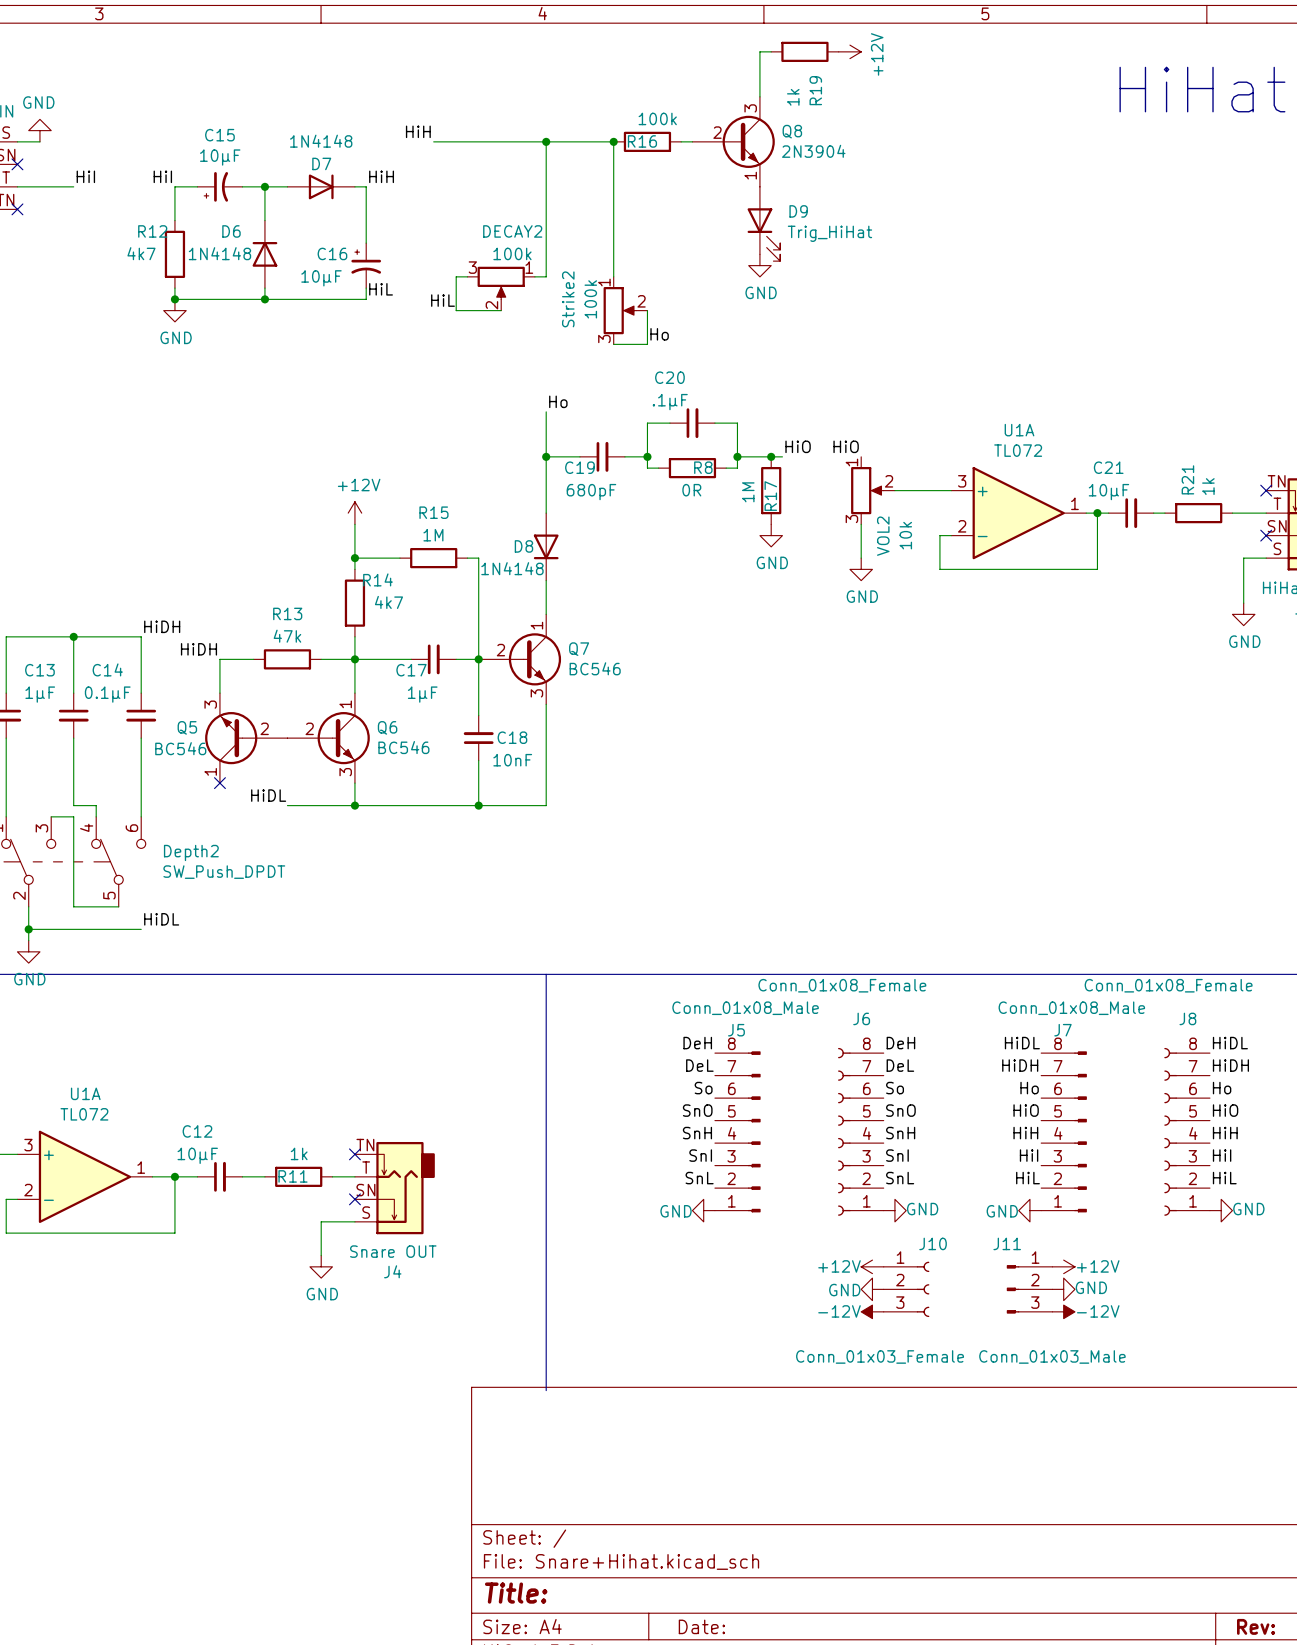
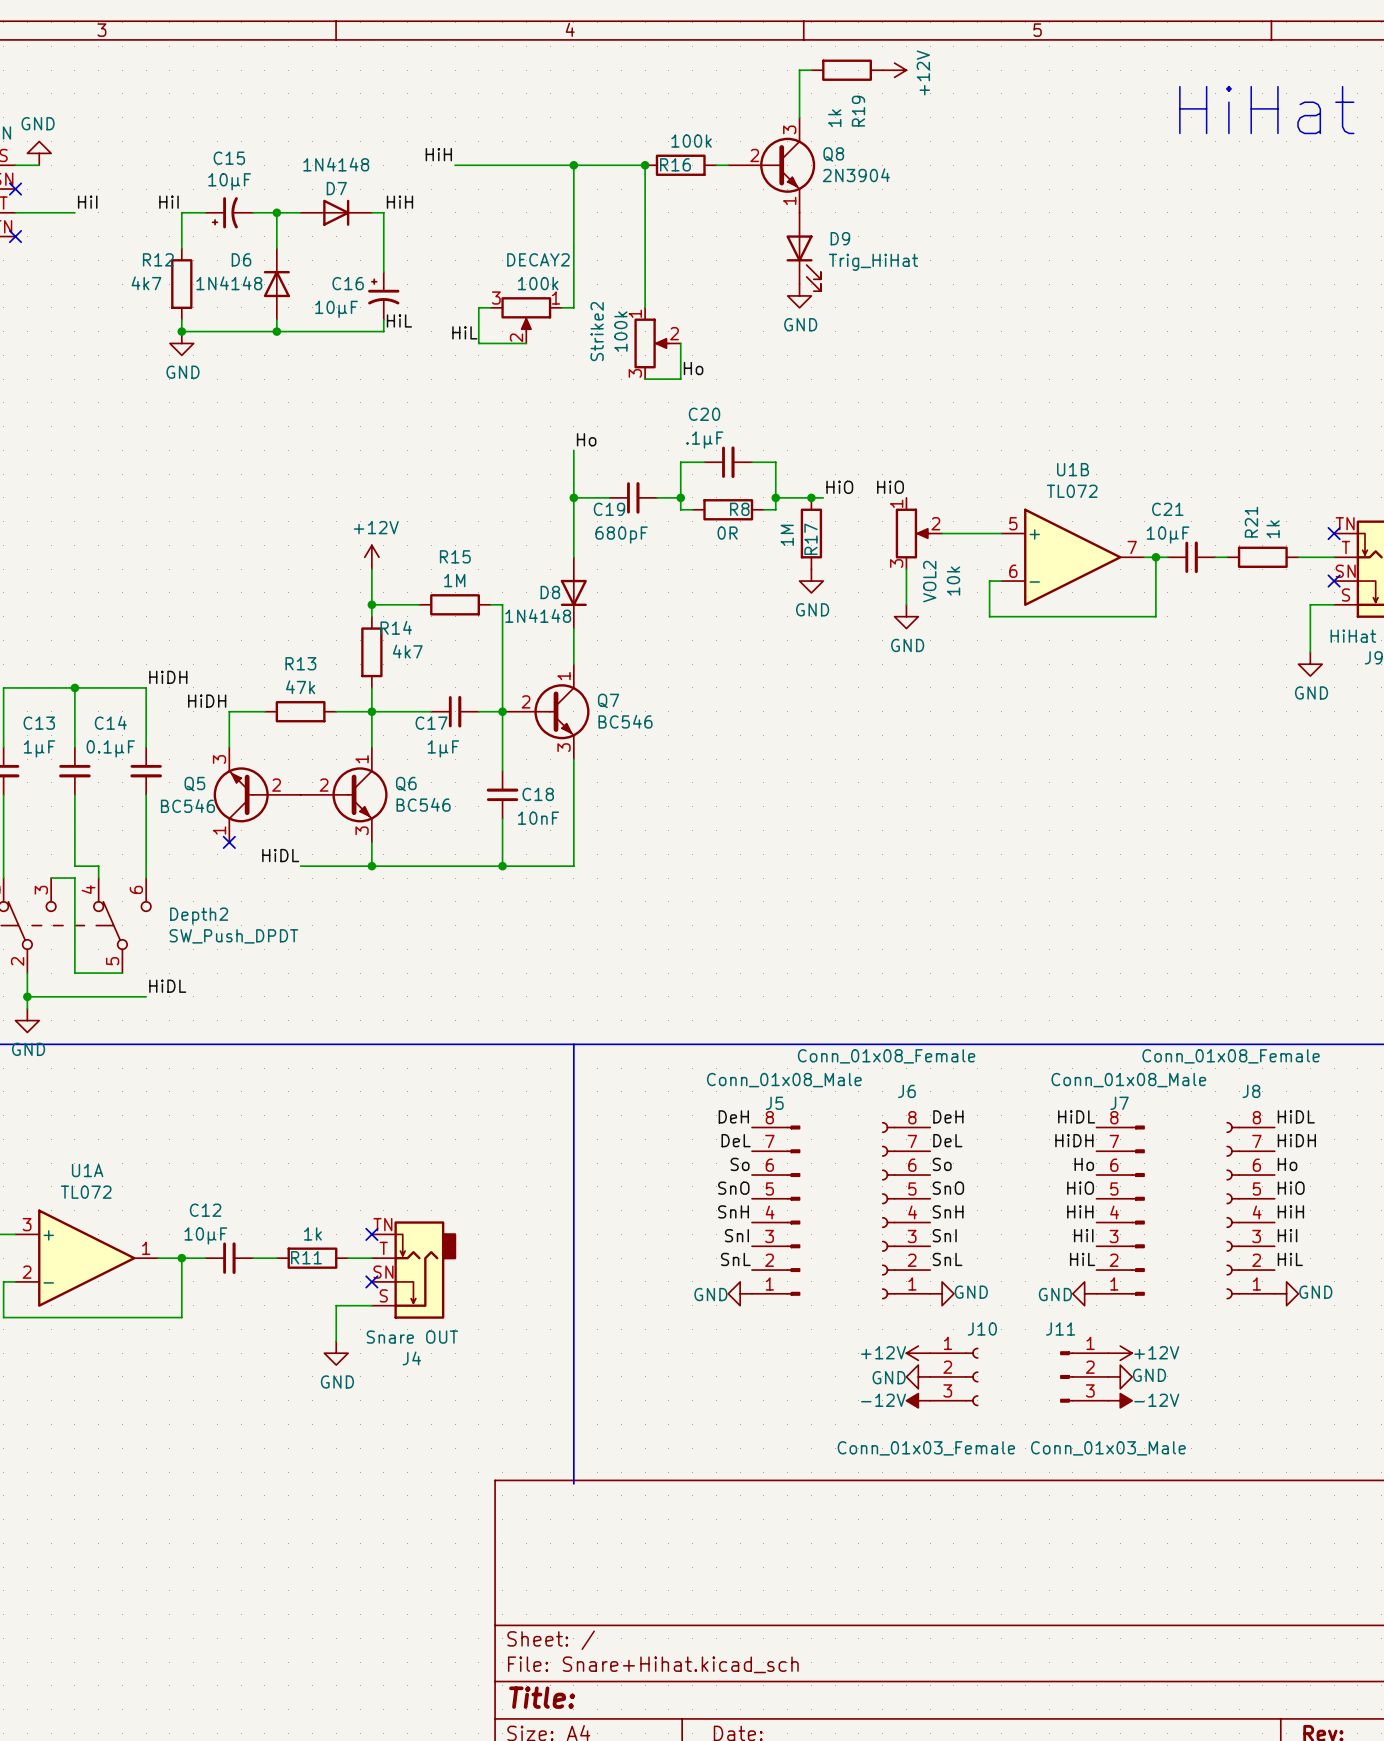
U1A name: U1A (1019, 430) -> U1B (1073, 469)
U1A pin number: 3 (962, 481) -> 5 (1013, 523)
U1A pin number: 1 (1074, 503) -> 7 (1132, 547)
U1A pin number: 2 (962, 526) -> 6 (1013, 571)

